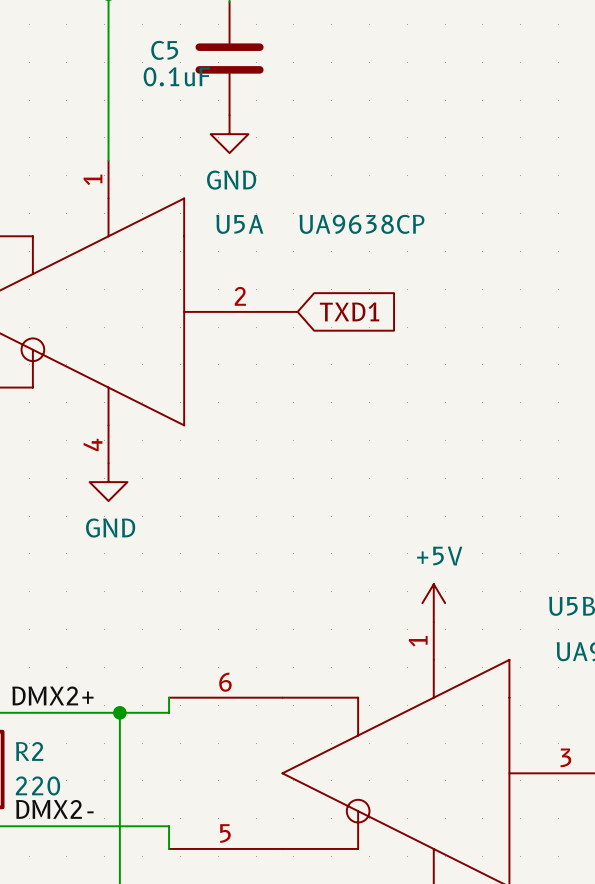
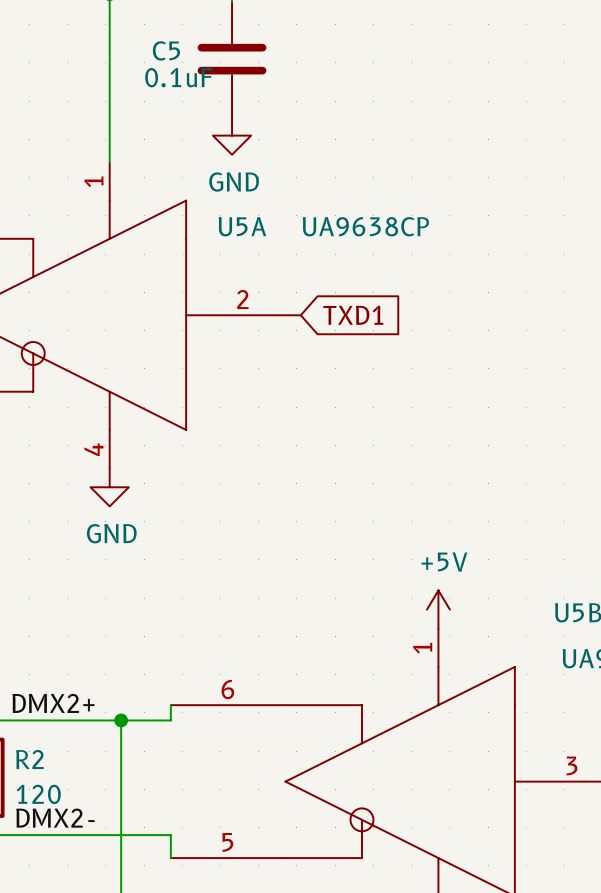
R2 value: 220 (38, 785) -> 120 (38, 794)

